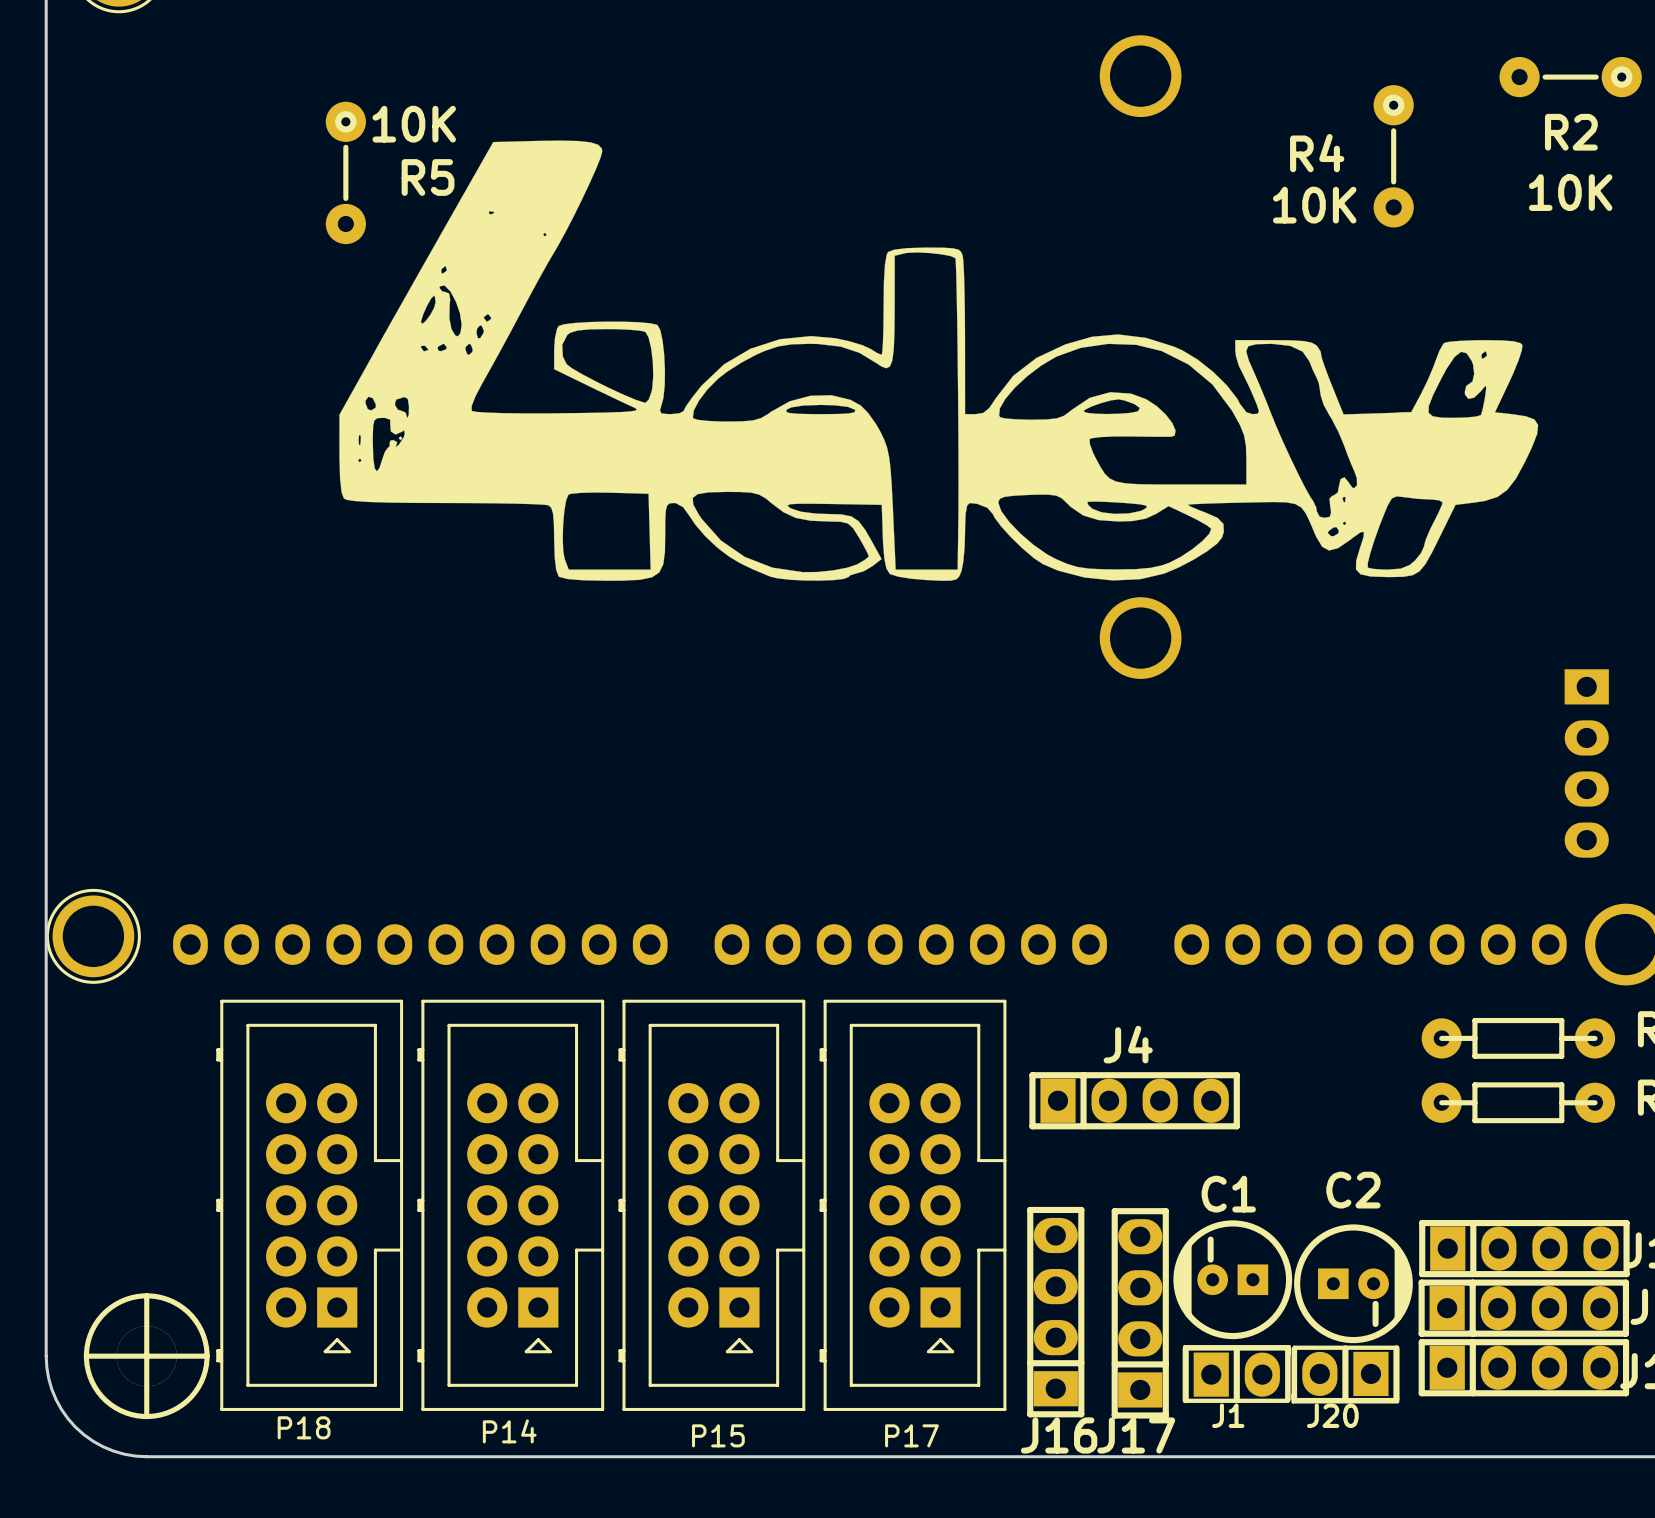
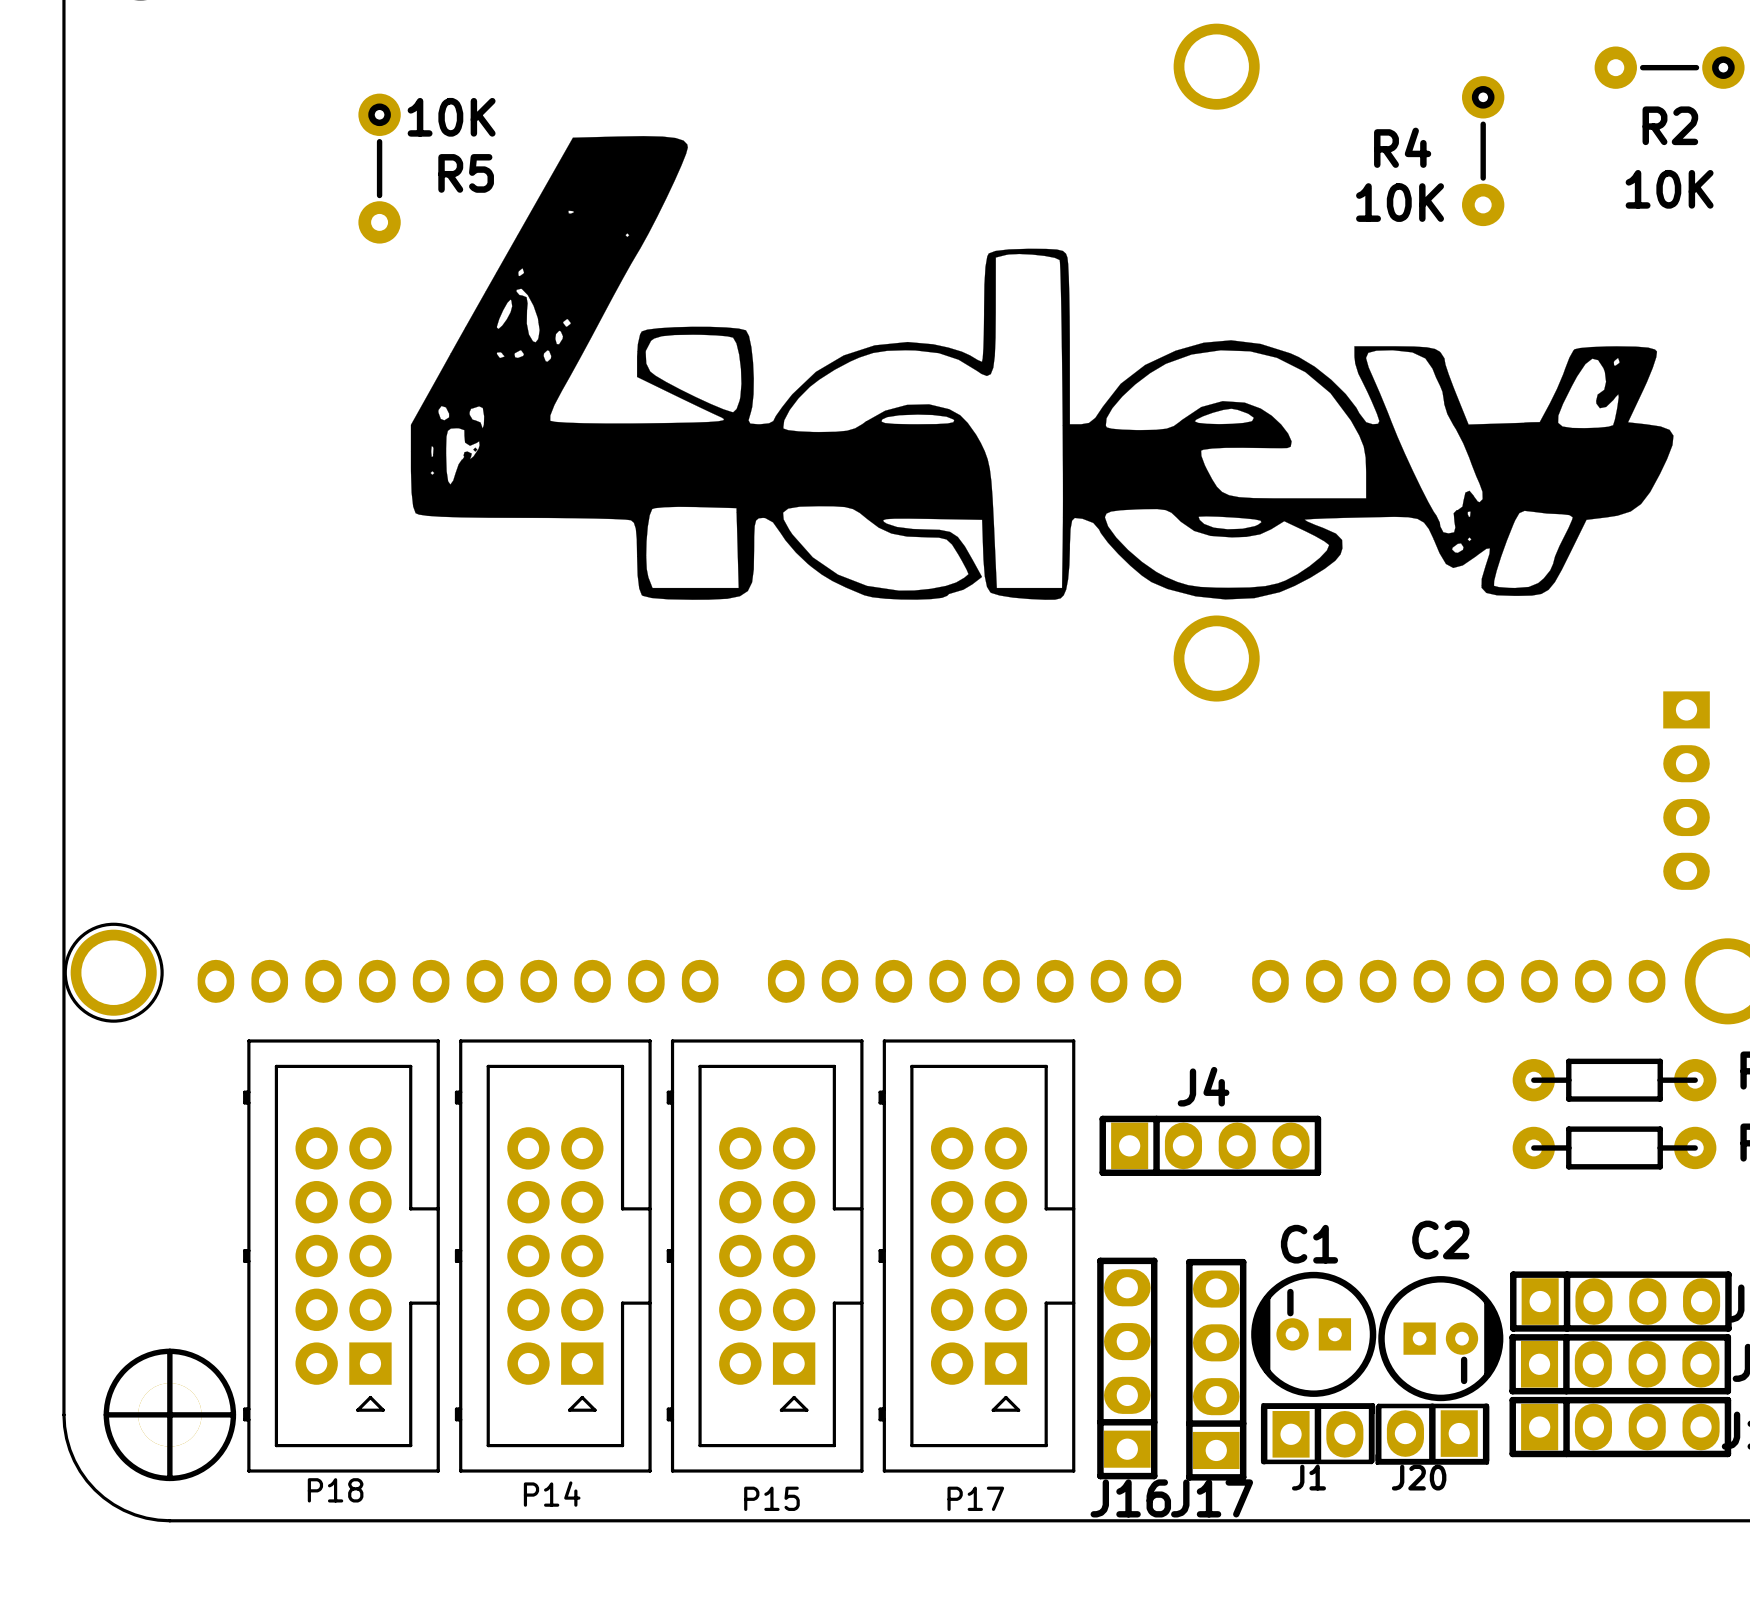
drawing position: (938, 360) -> (1042, 367)

